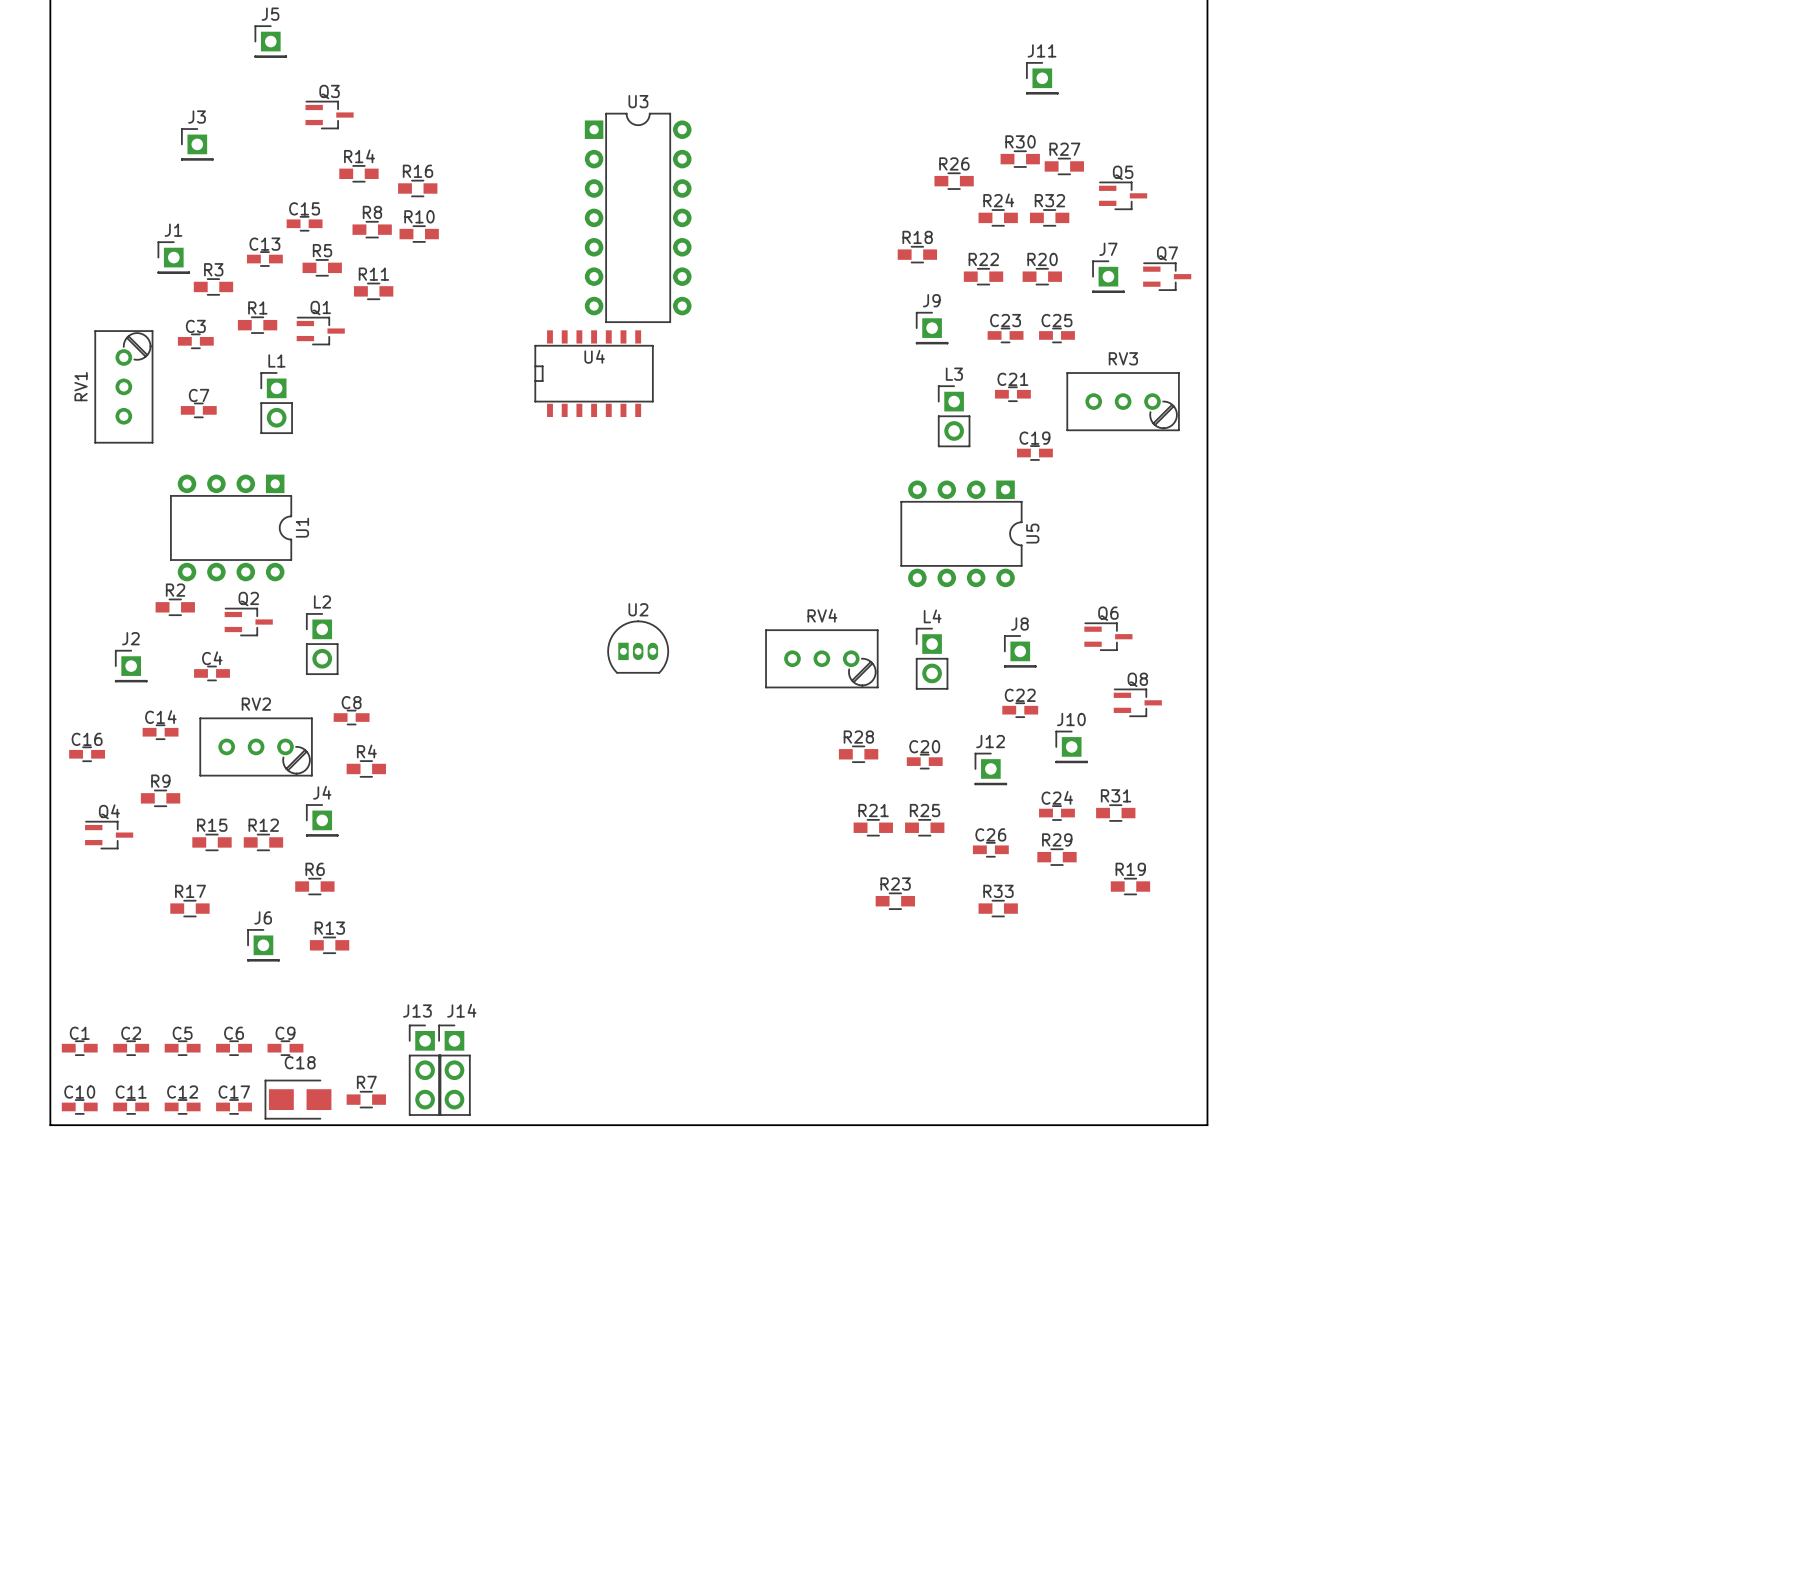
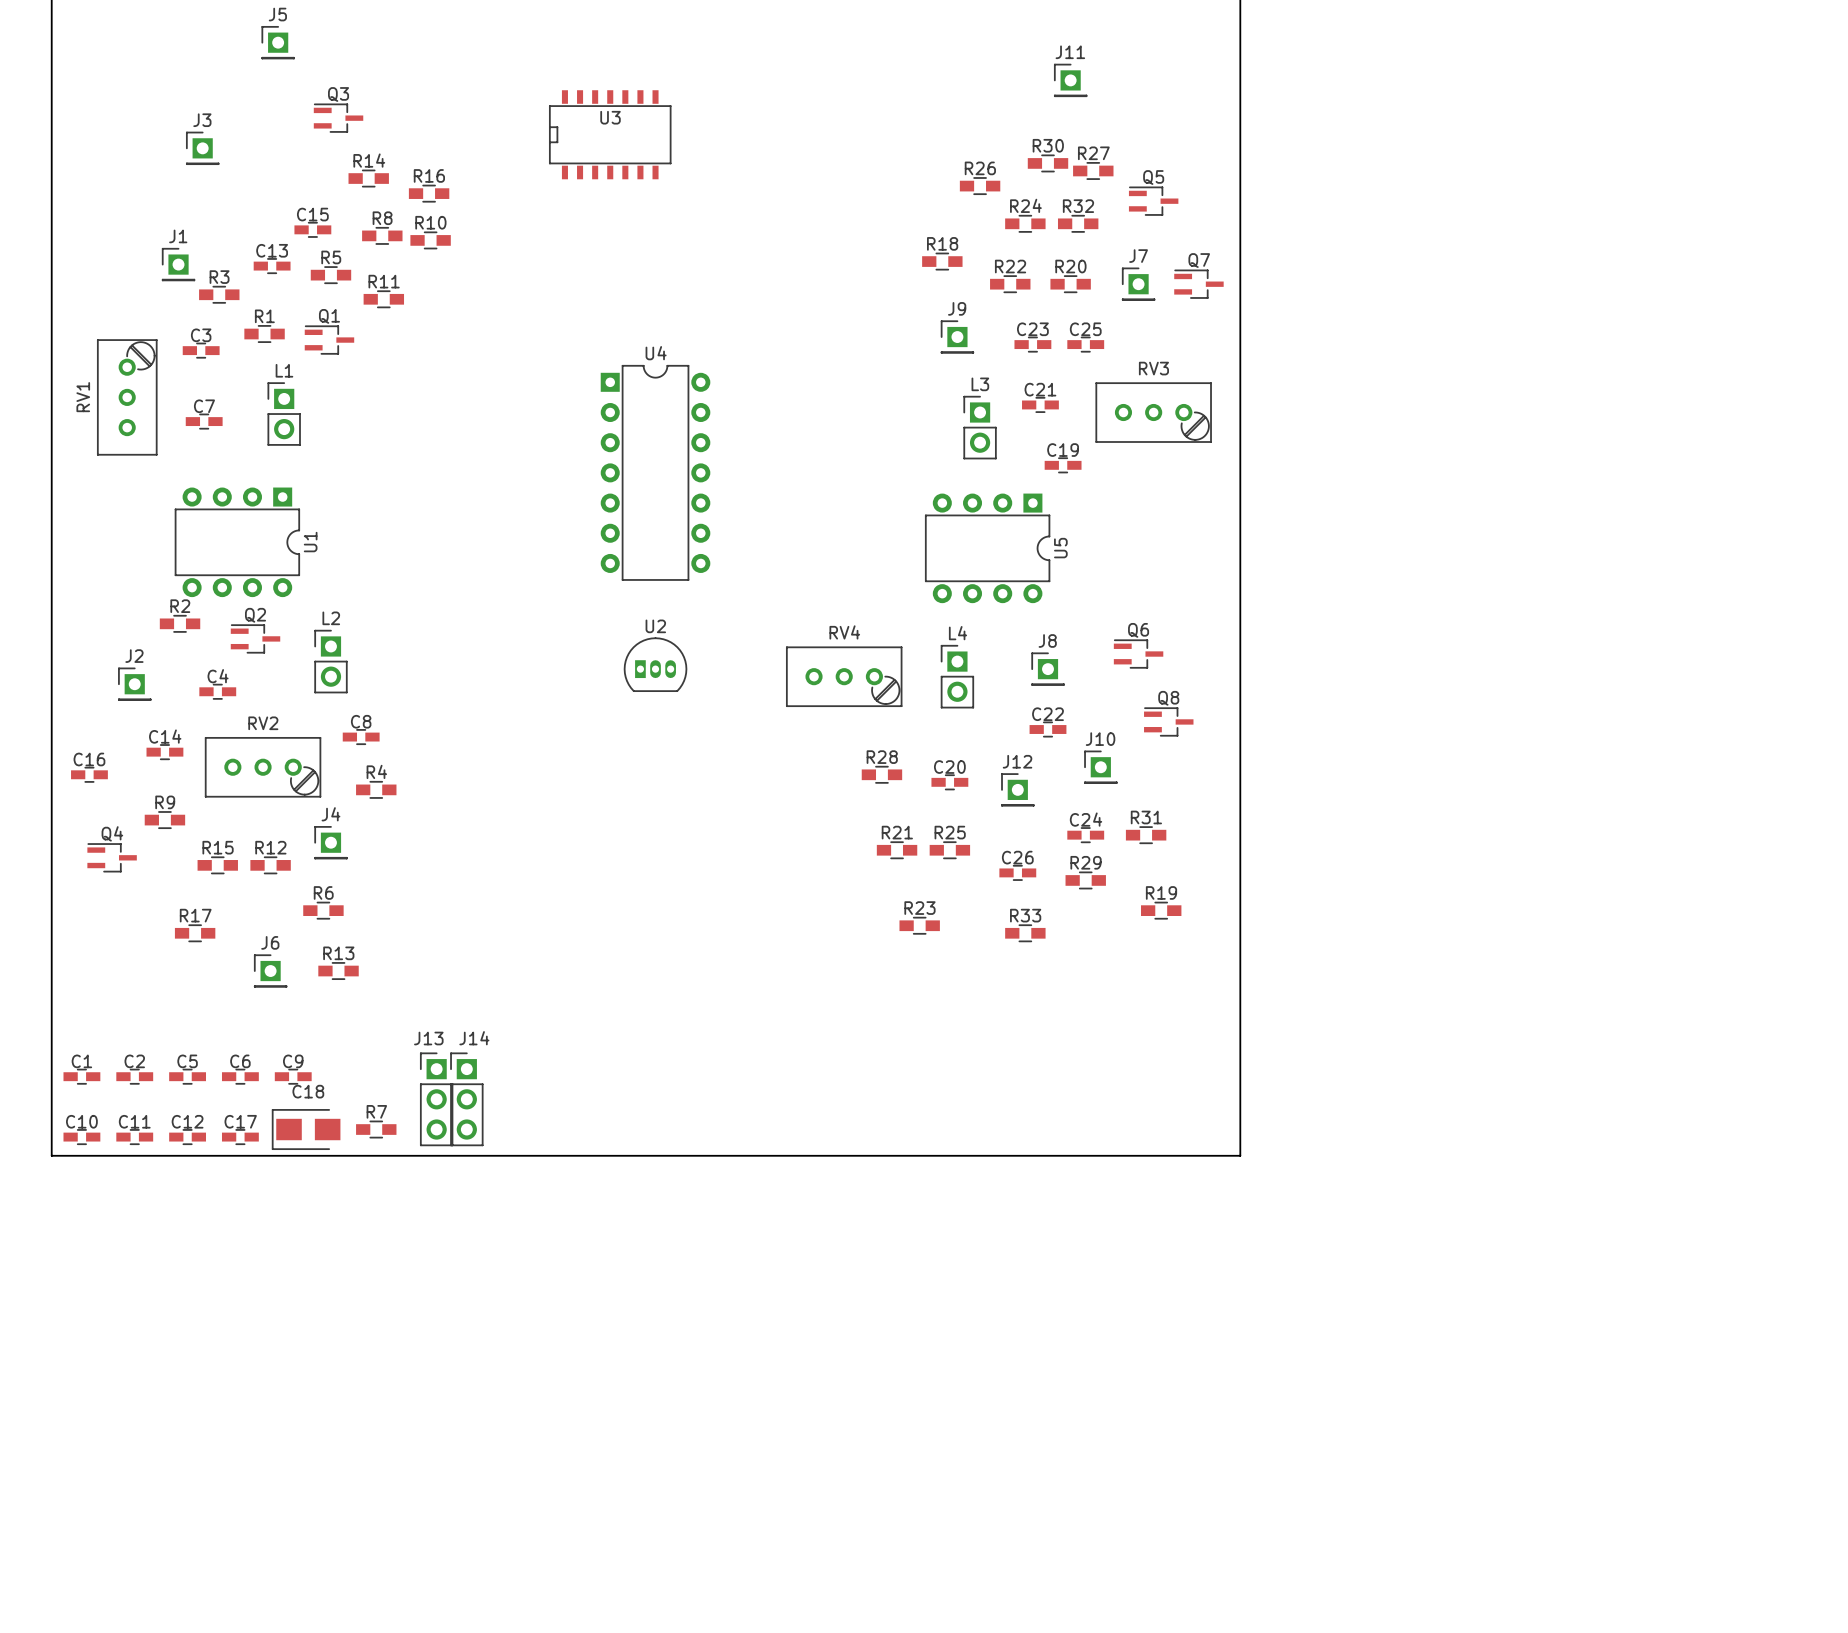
U3 name position: U3 (638, 101) -> U3 (610, 117)
U3 footprint: [584, 112, 692, 323] -> [548, 90, 672, 180]
U4 footprint: [534, 330, 654, 418] -> [600, 365, 711, 581]
U4 name position: U4 (594, 356) -> U4 (656, 353)

